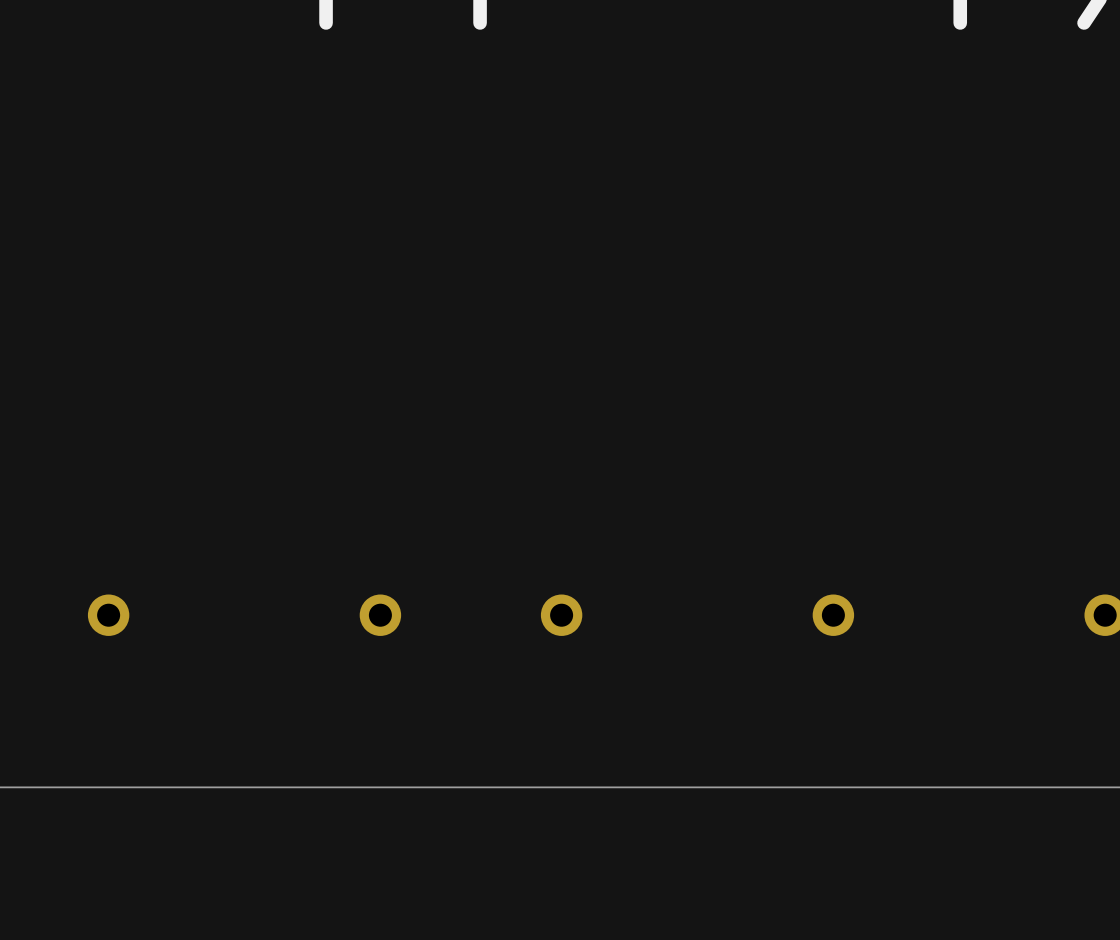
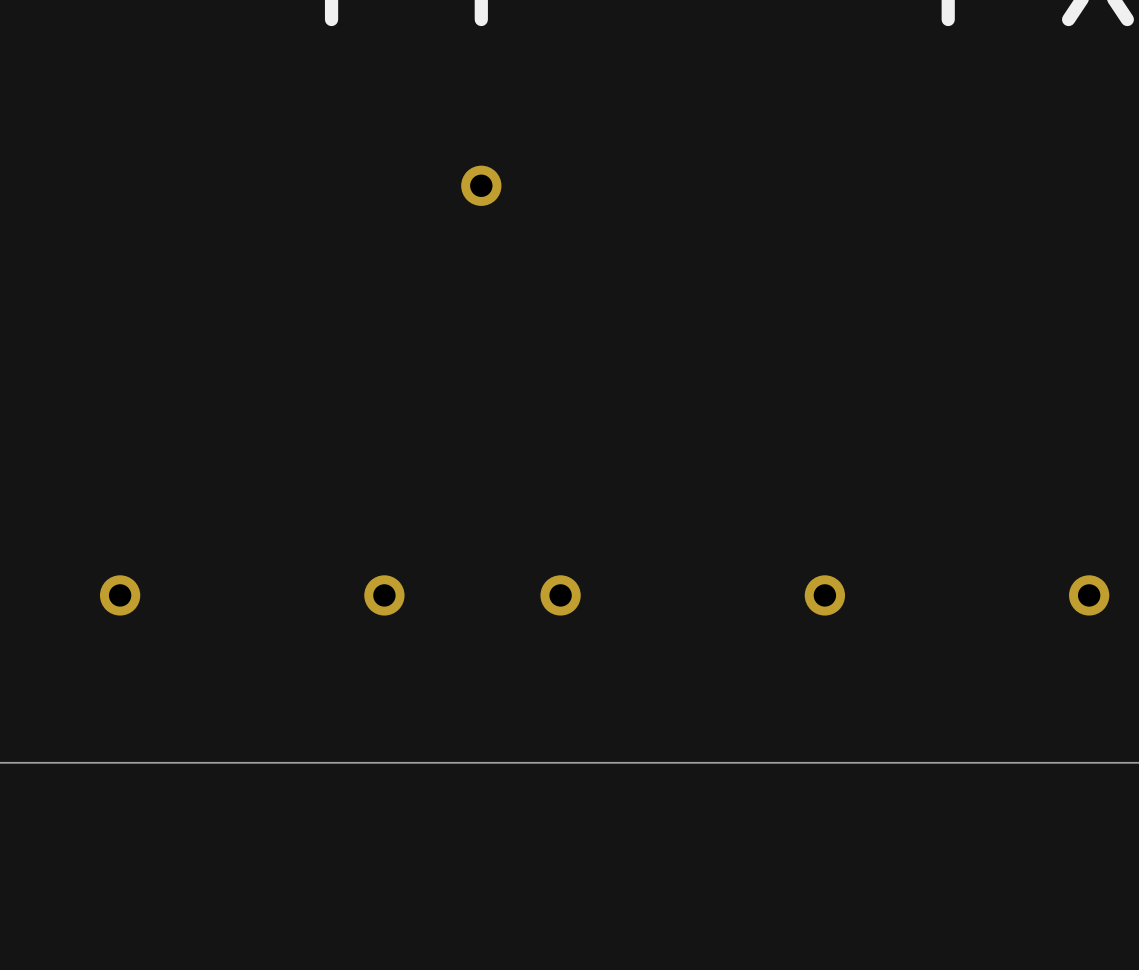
via: none -> (481, 185)

